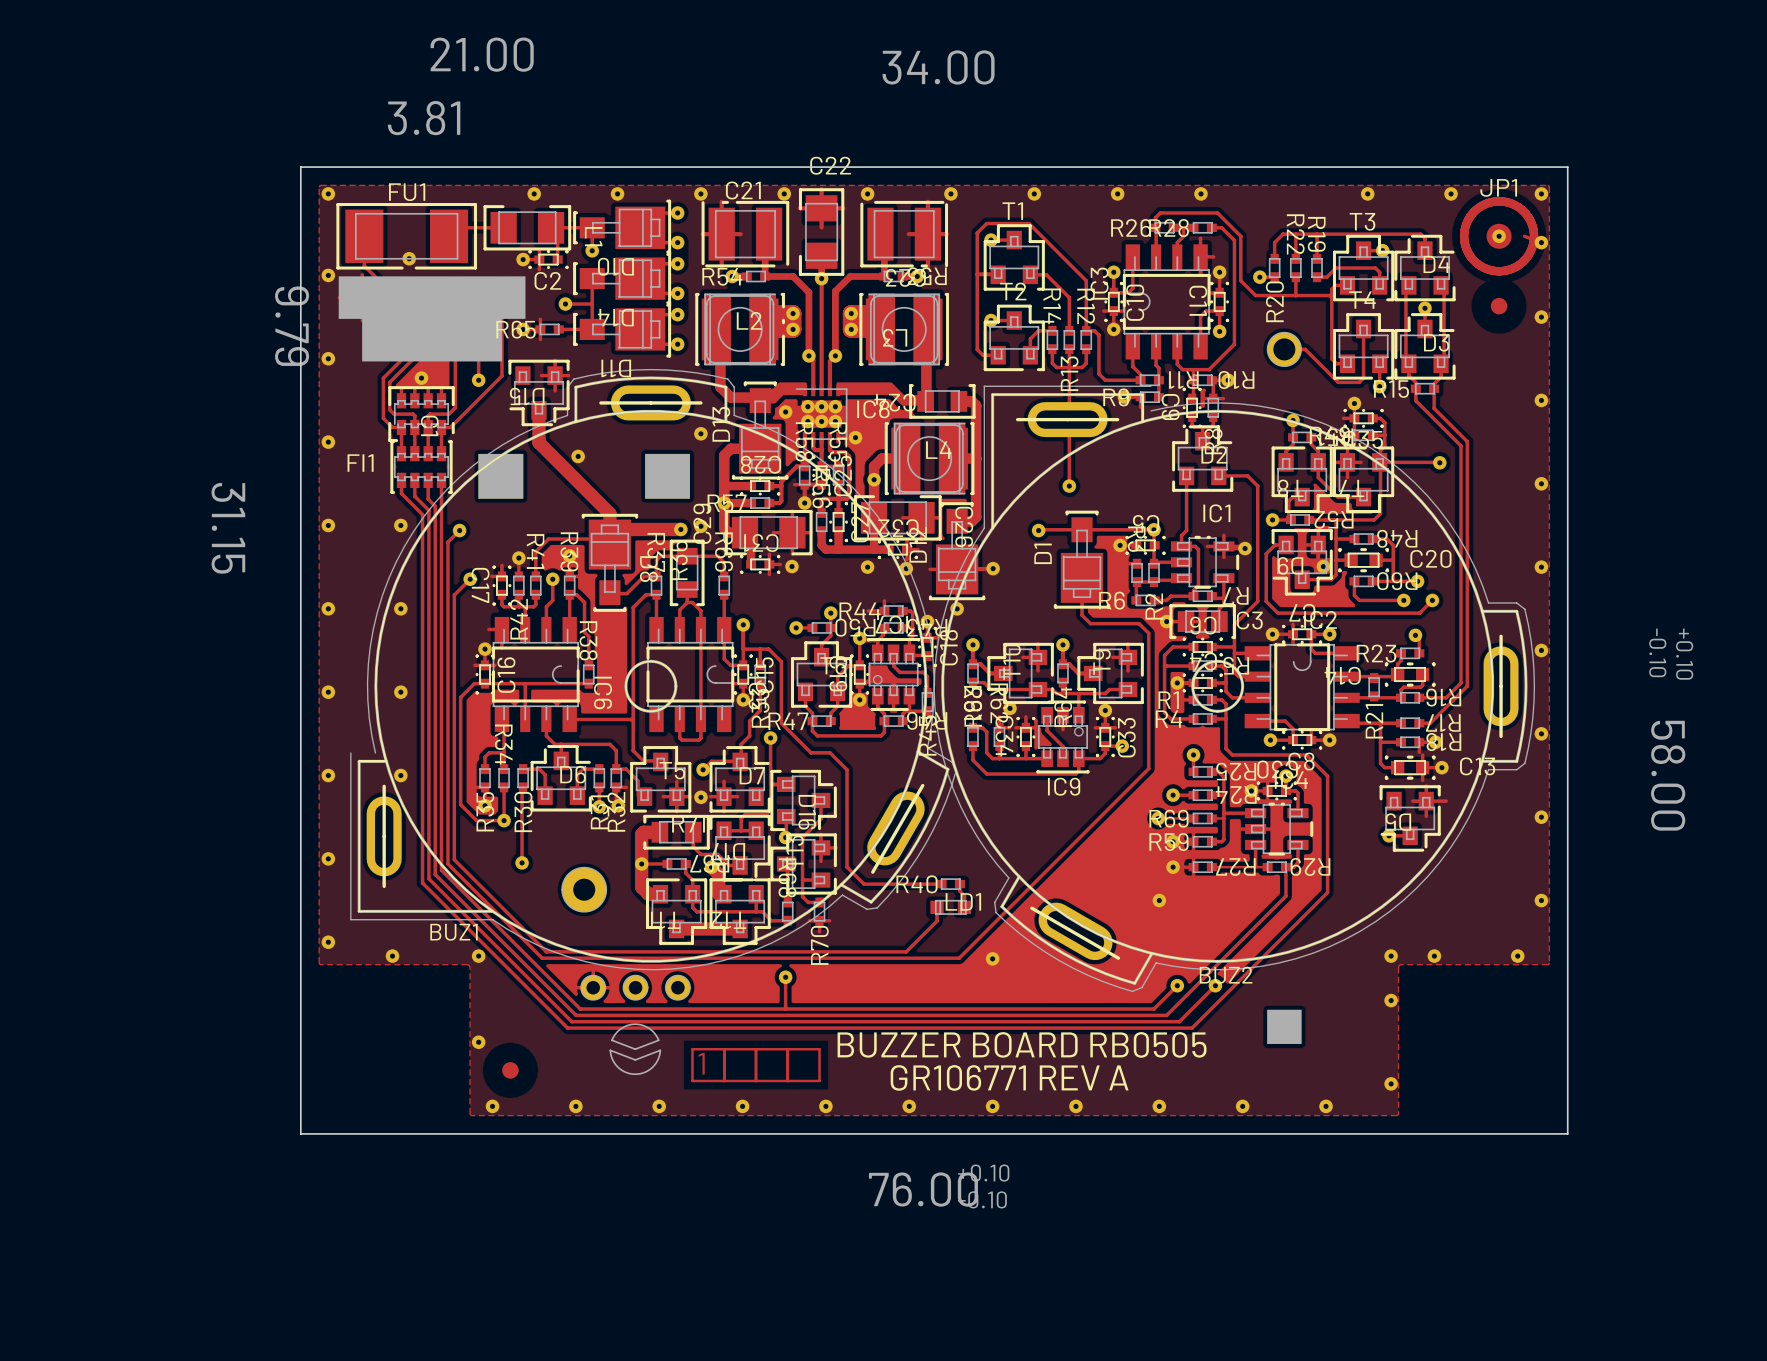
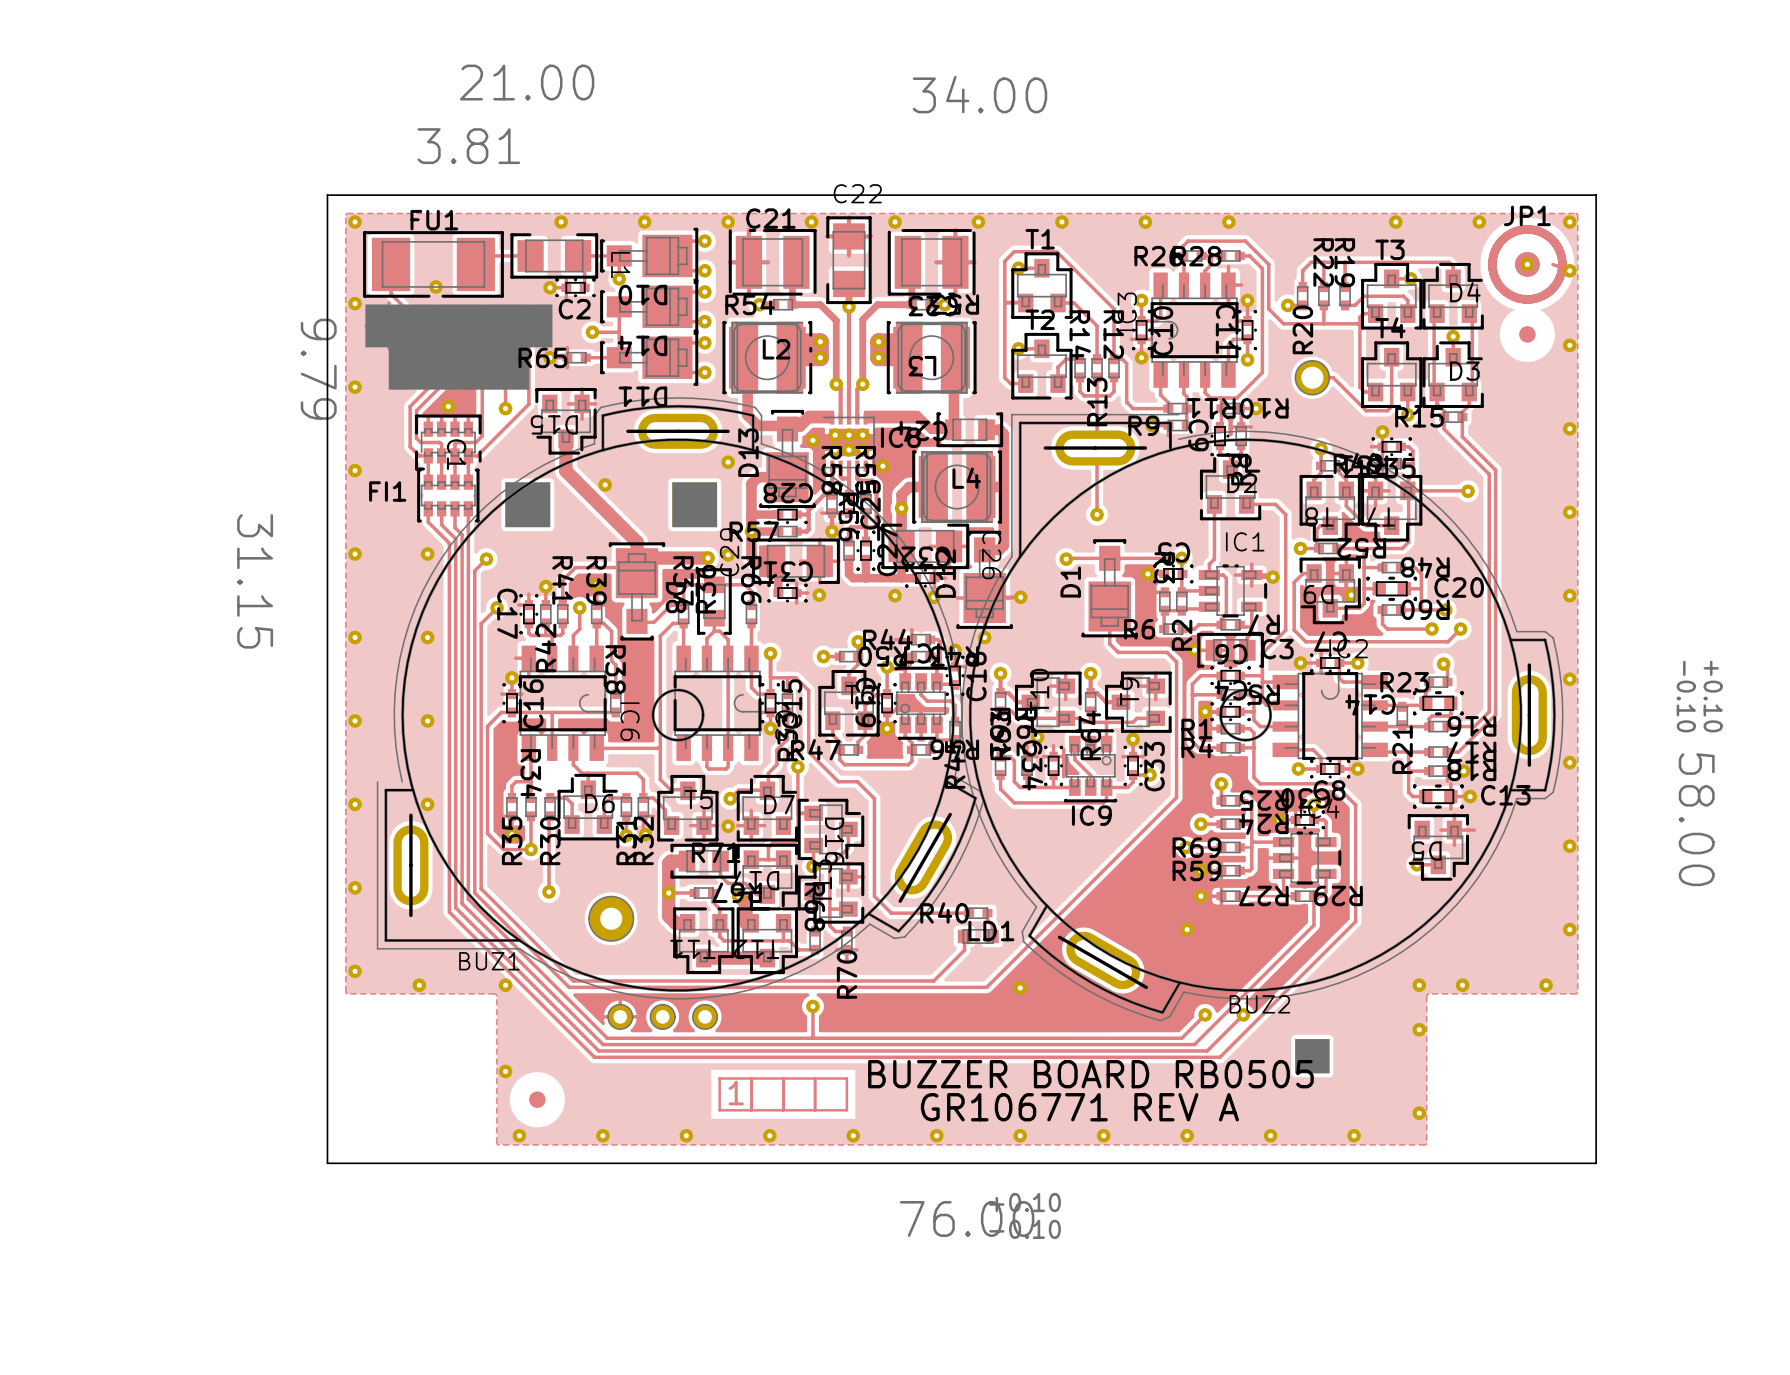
part: (635, 1049) -> none

